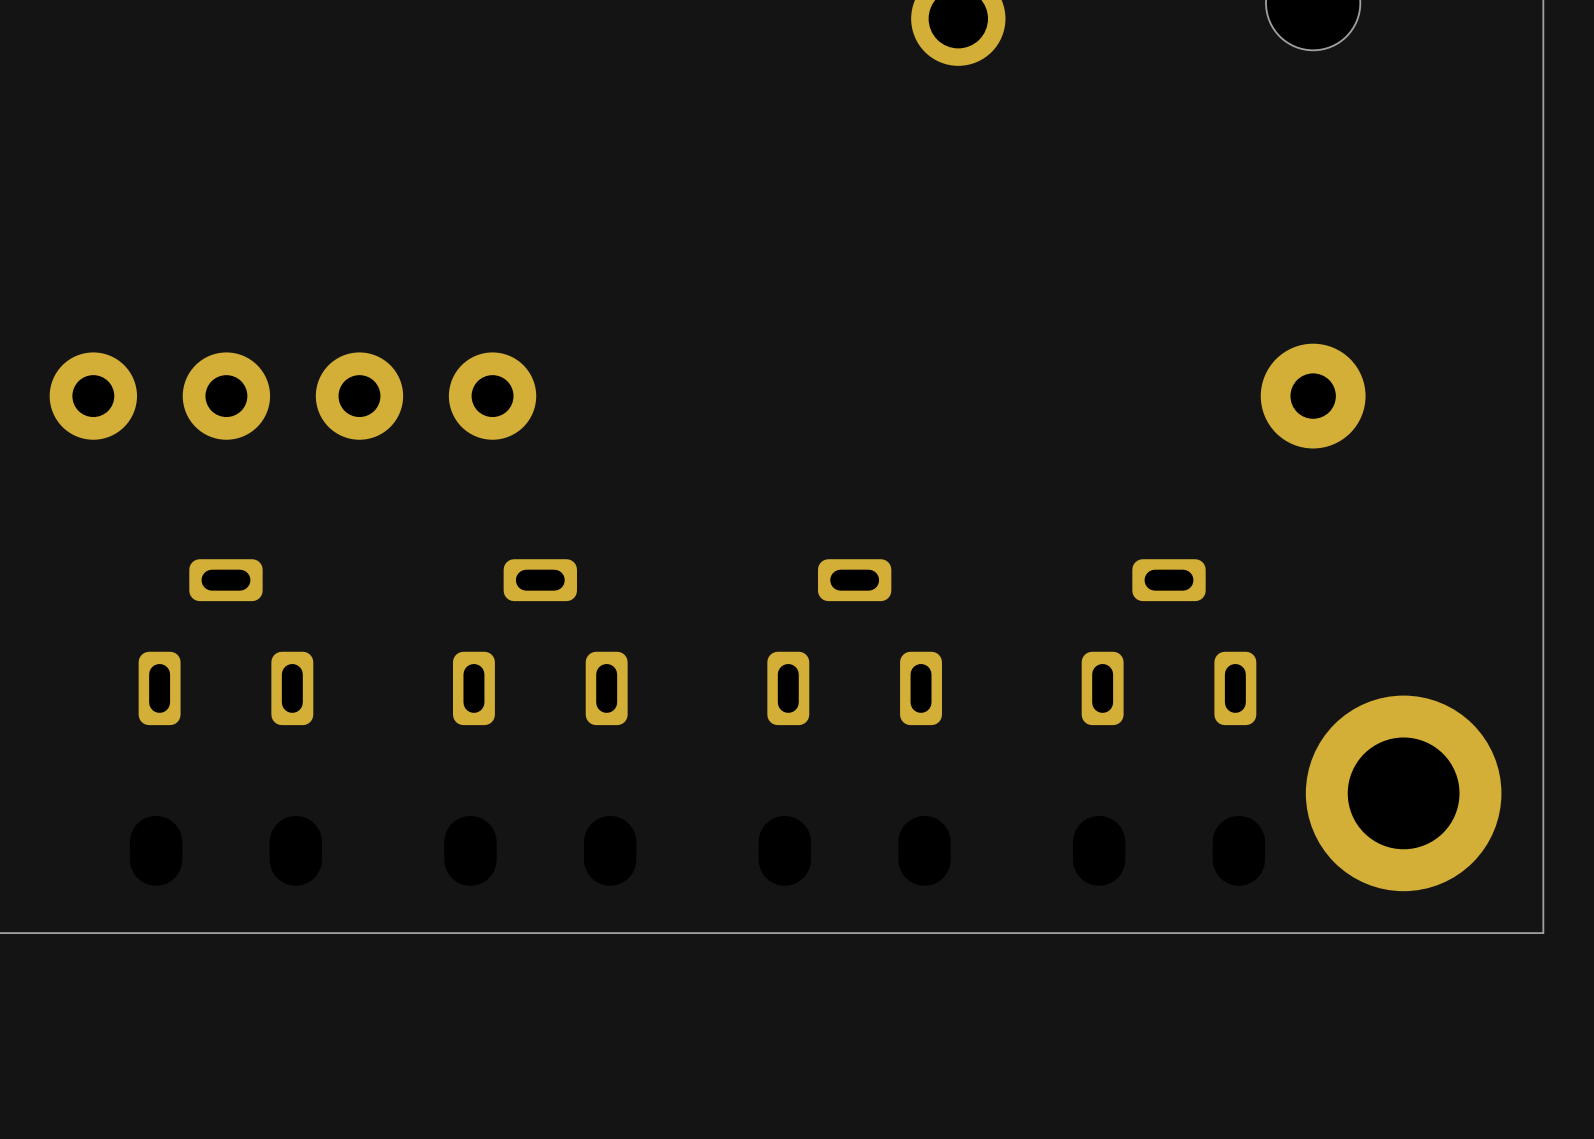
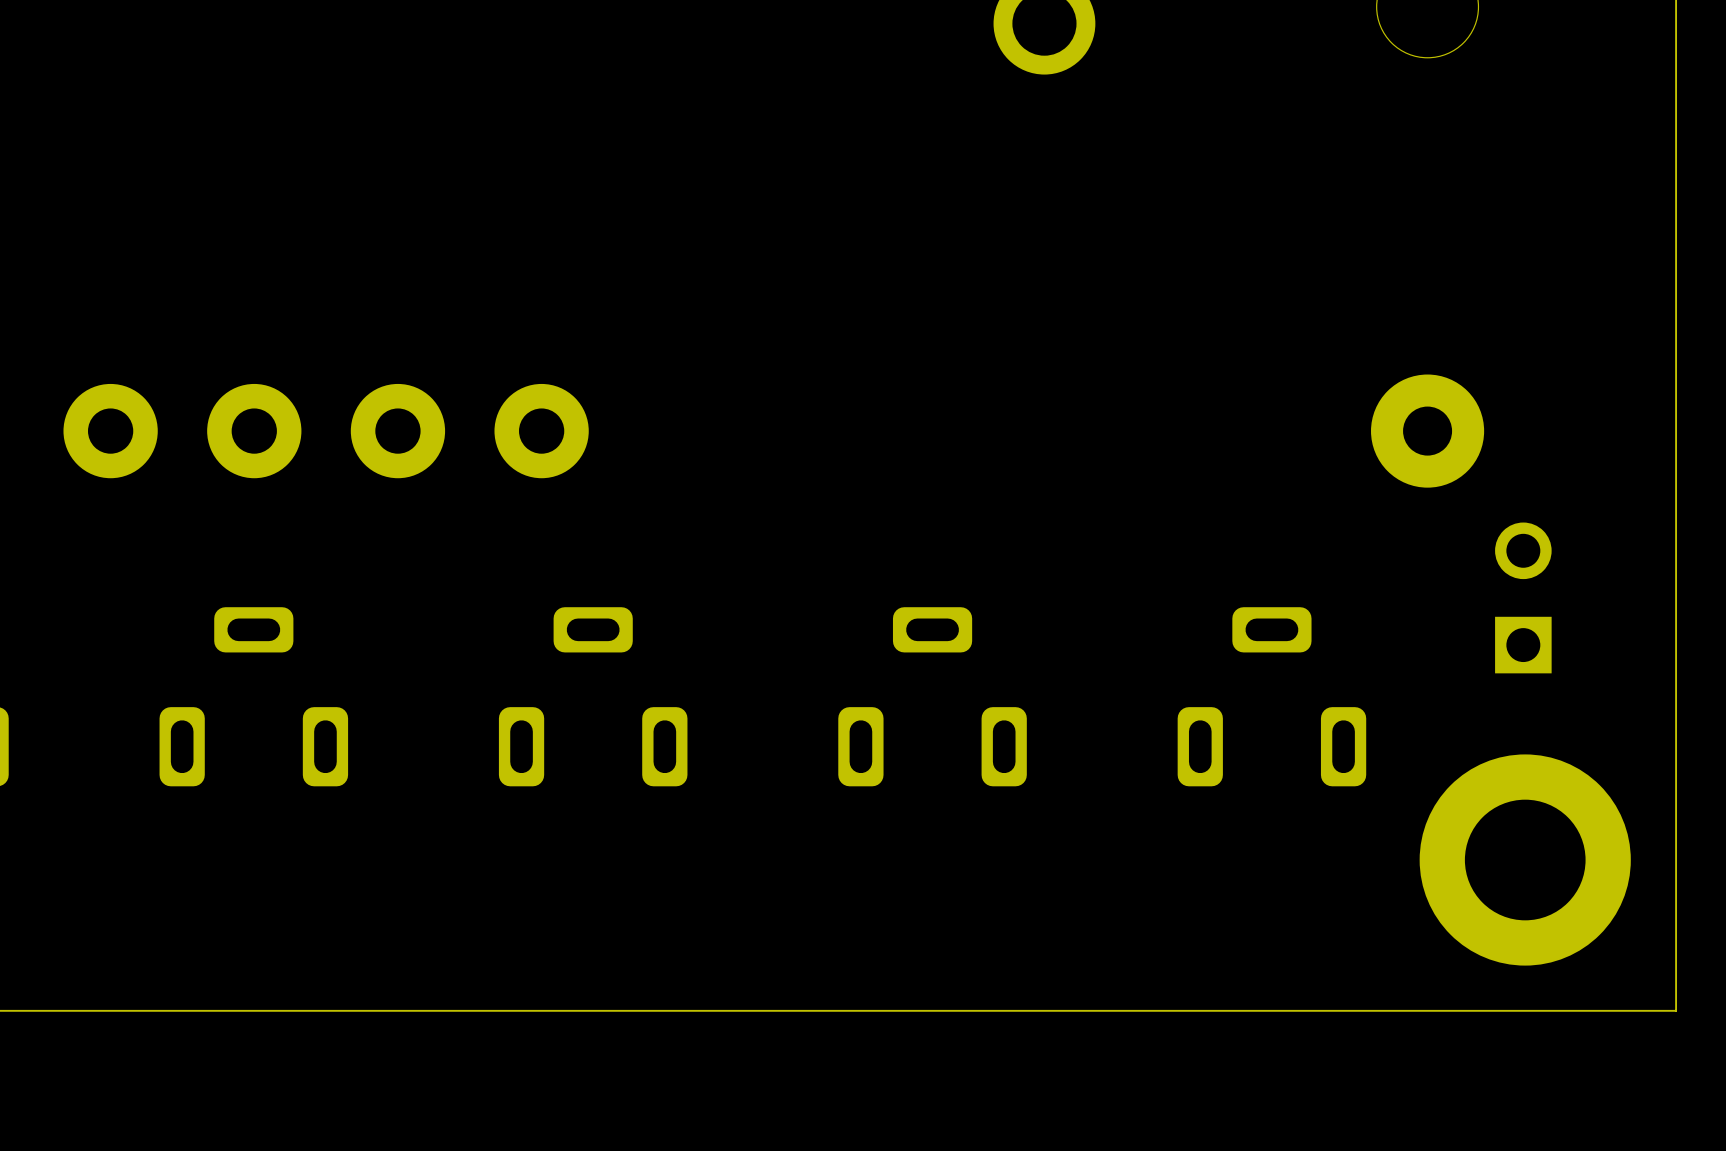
part: none -> (1523, 597)

